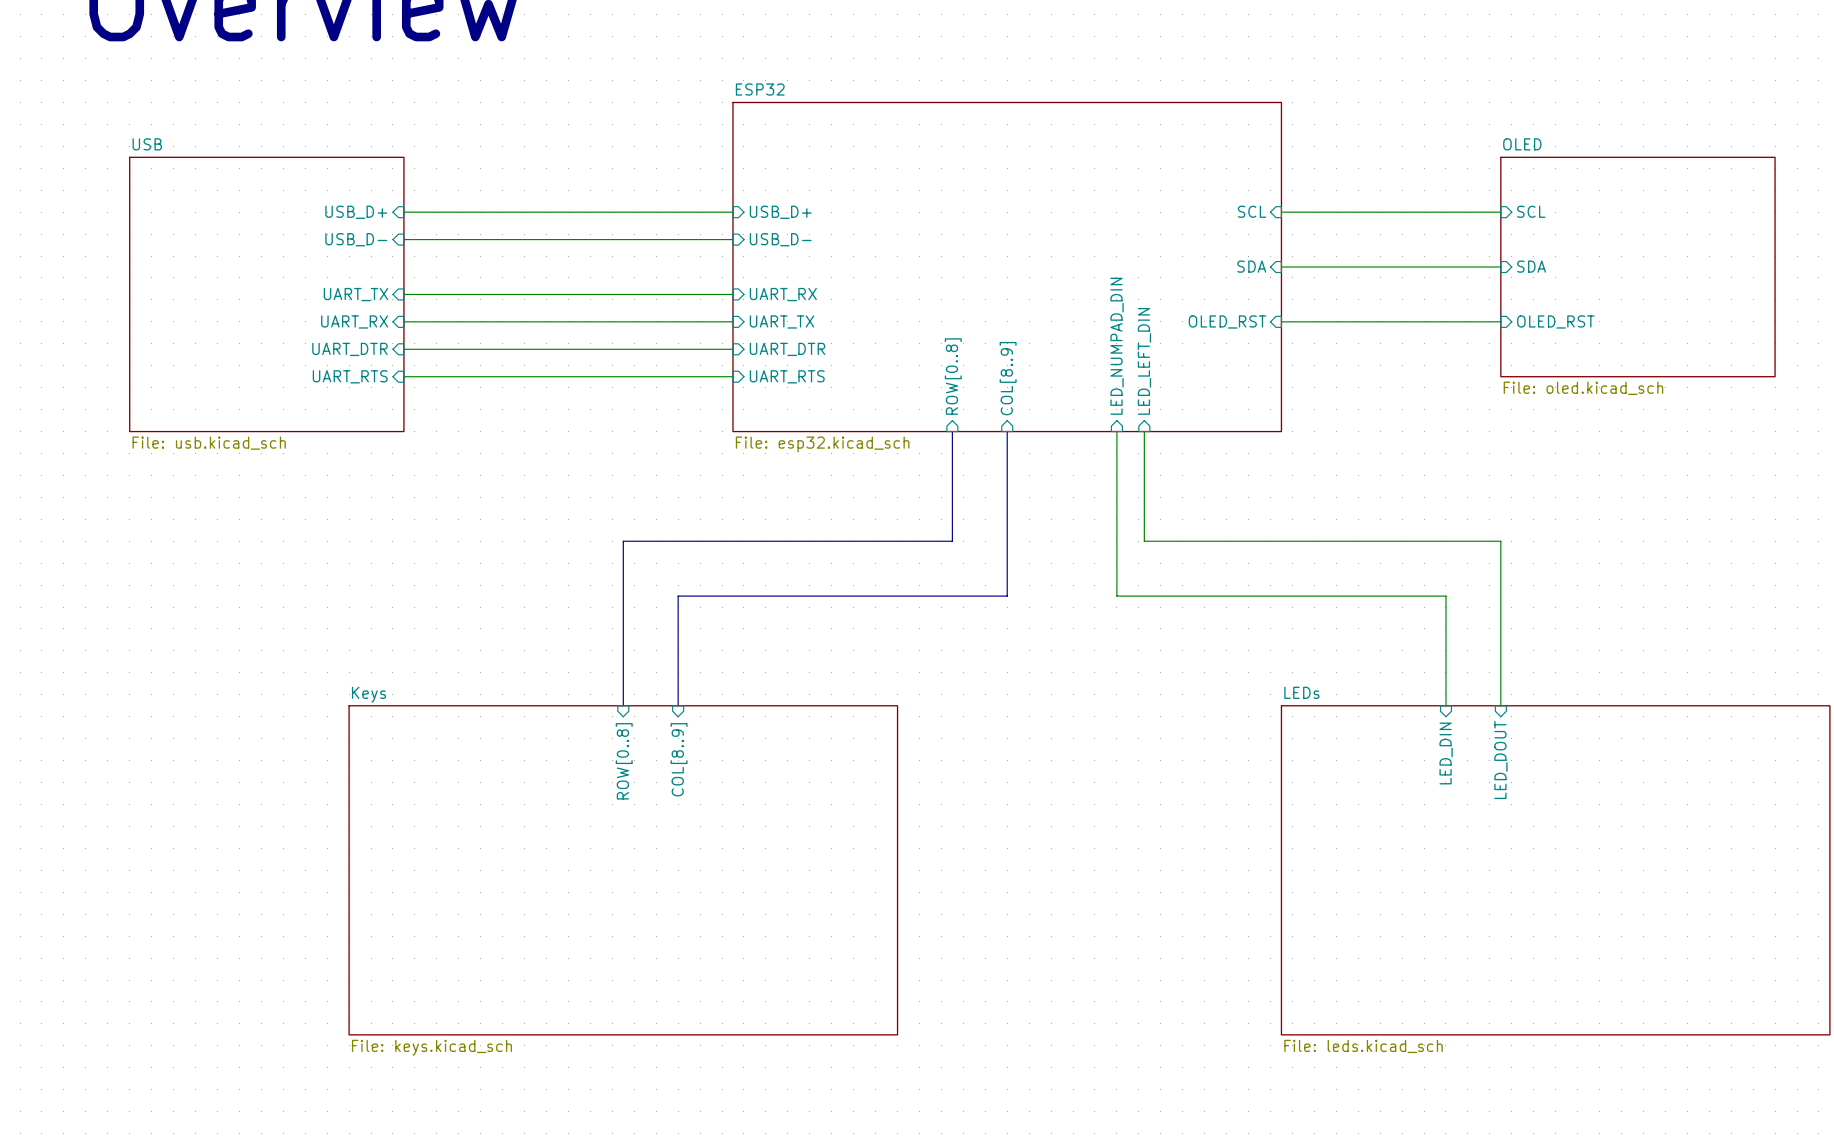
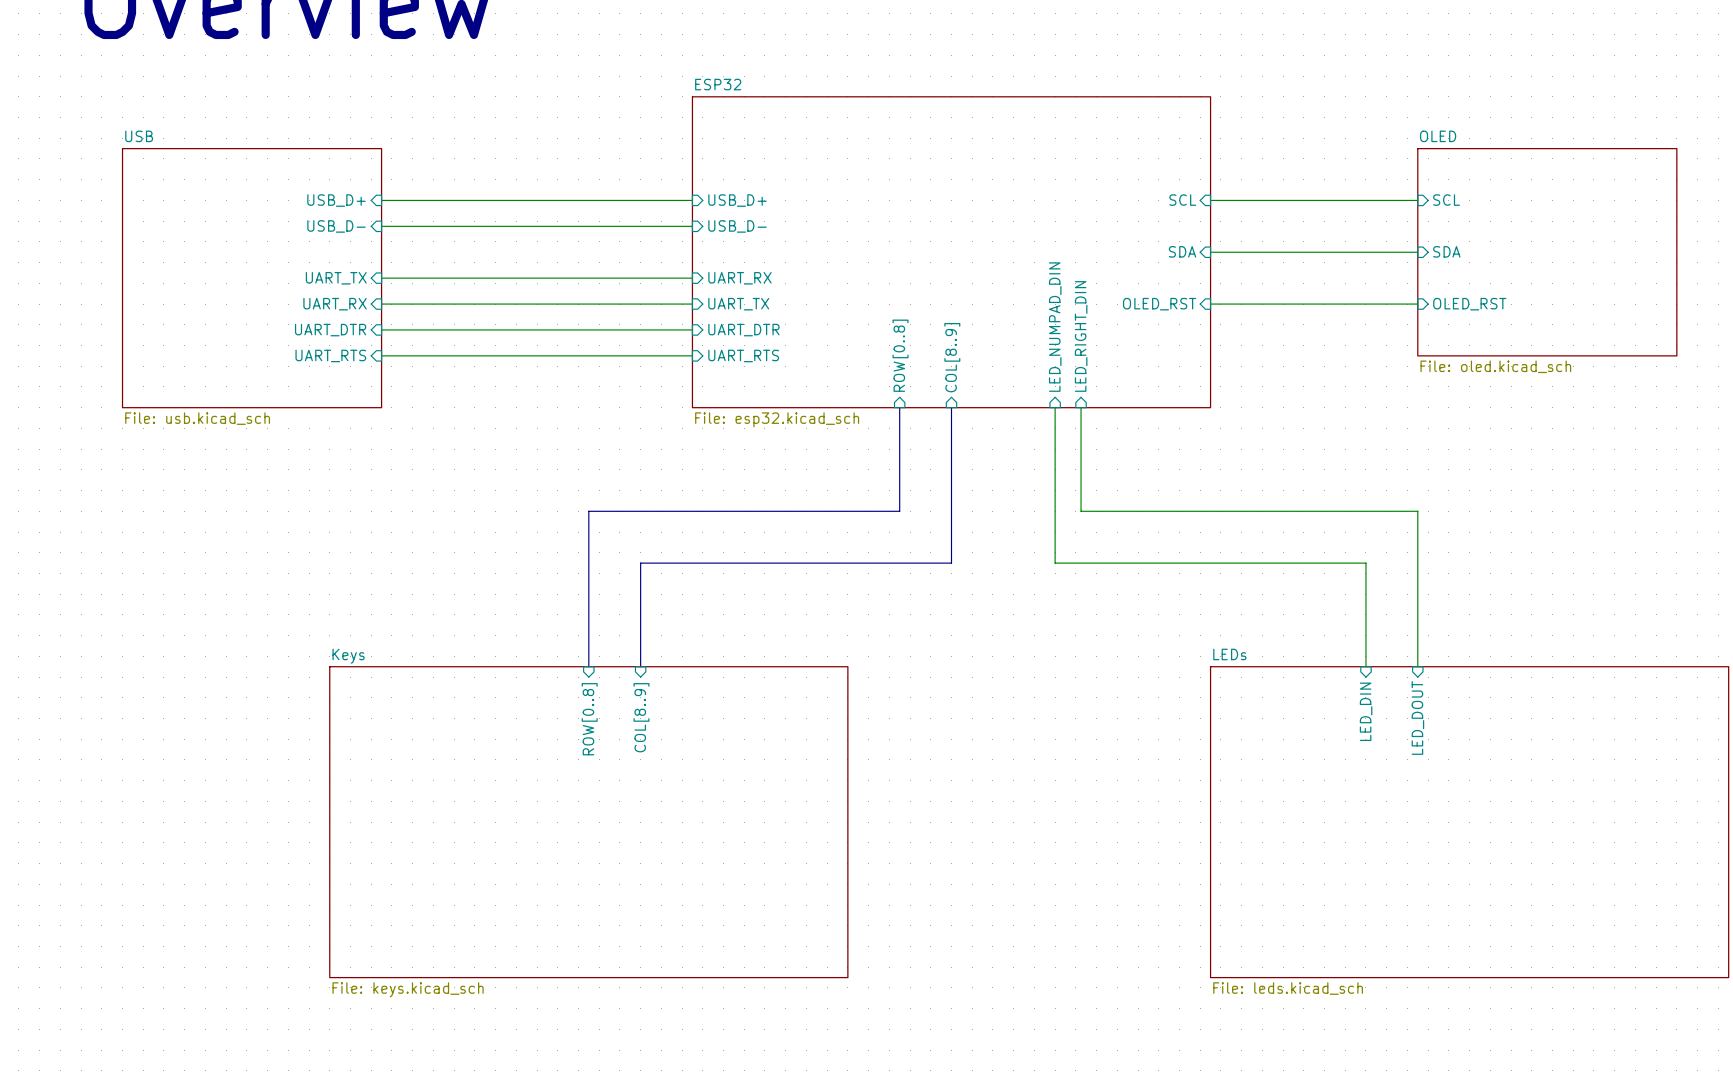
sheet pin: LED_LEFT_DIN (1144, 361) -> LED_RIGHT_DIN (1081, 336)

